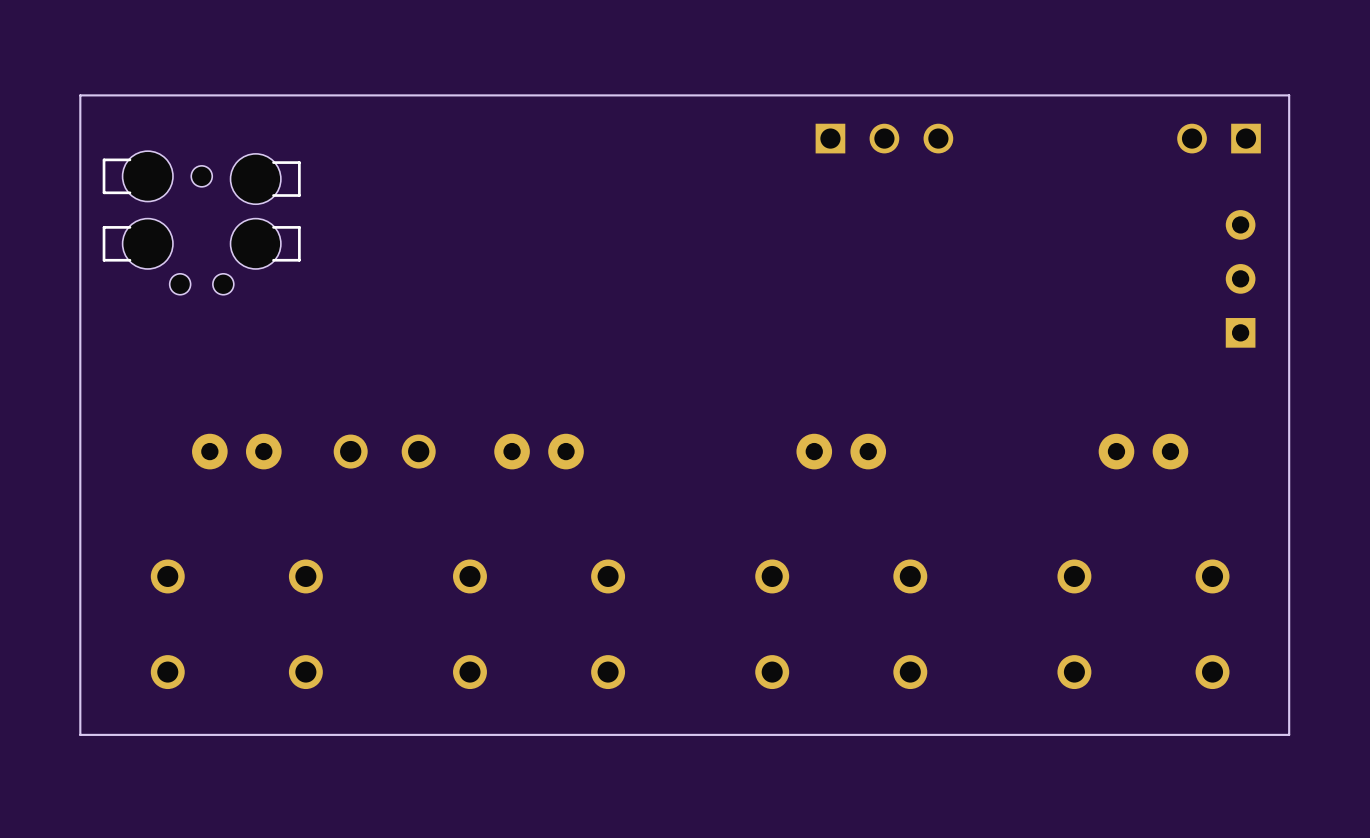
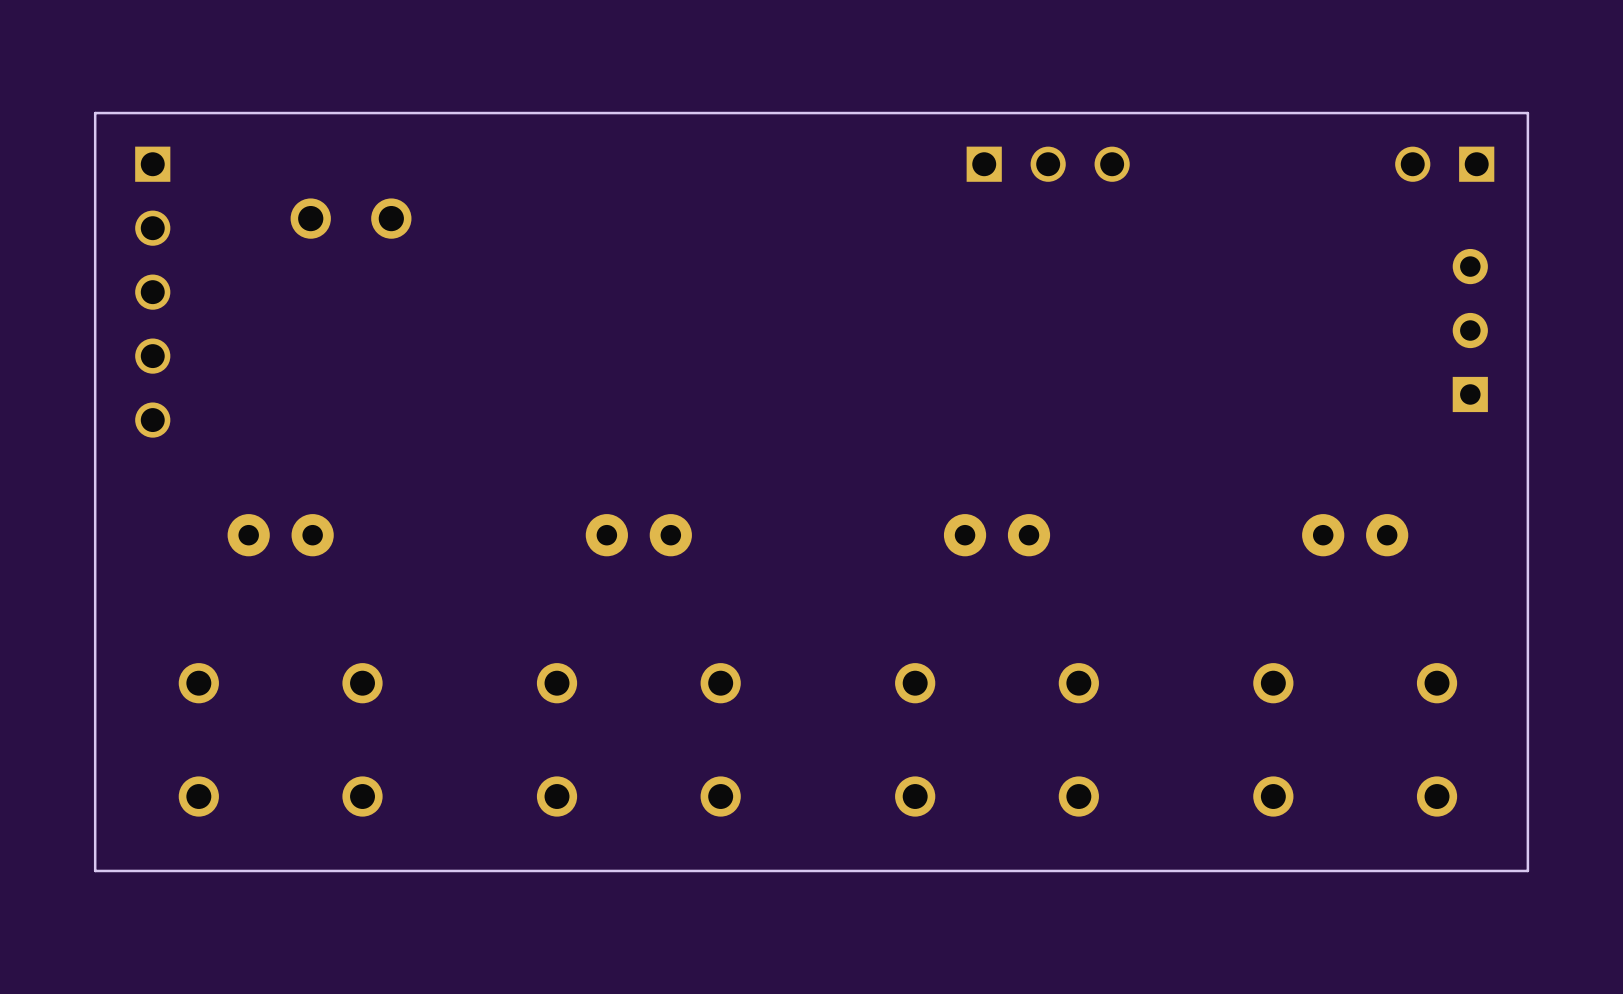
part: (201, 222) -> none
part: none -> (152, 292)
part position: (384, 451) -> (351, 218)

